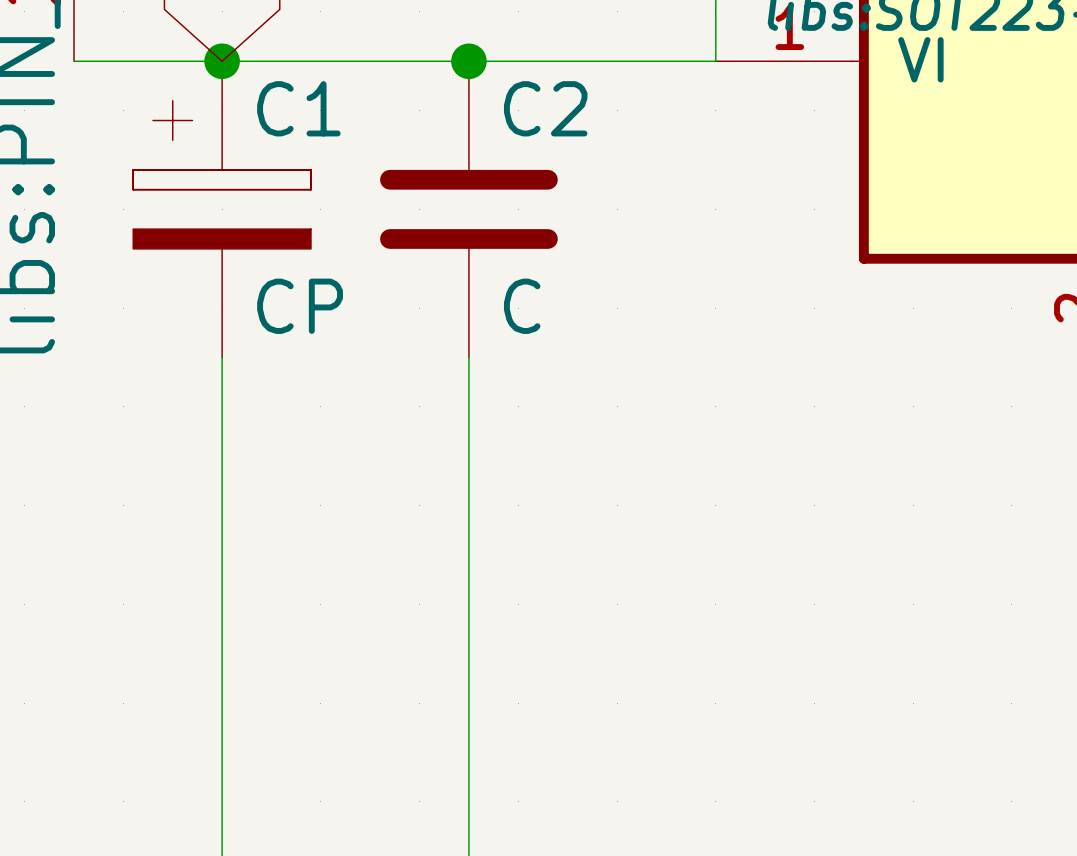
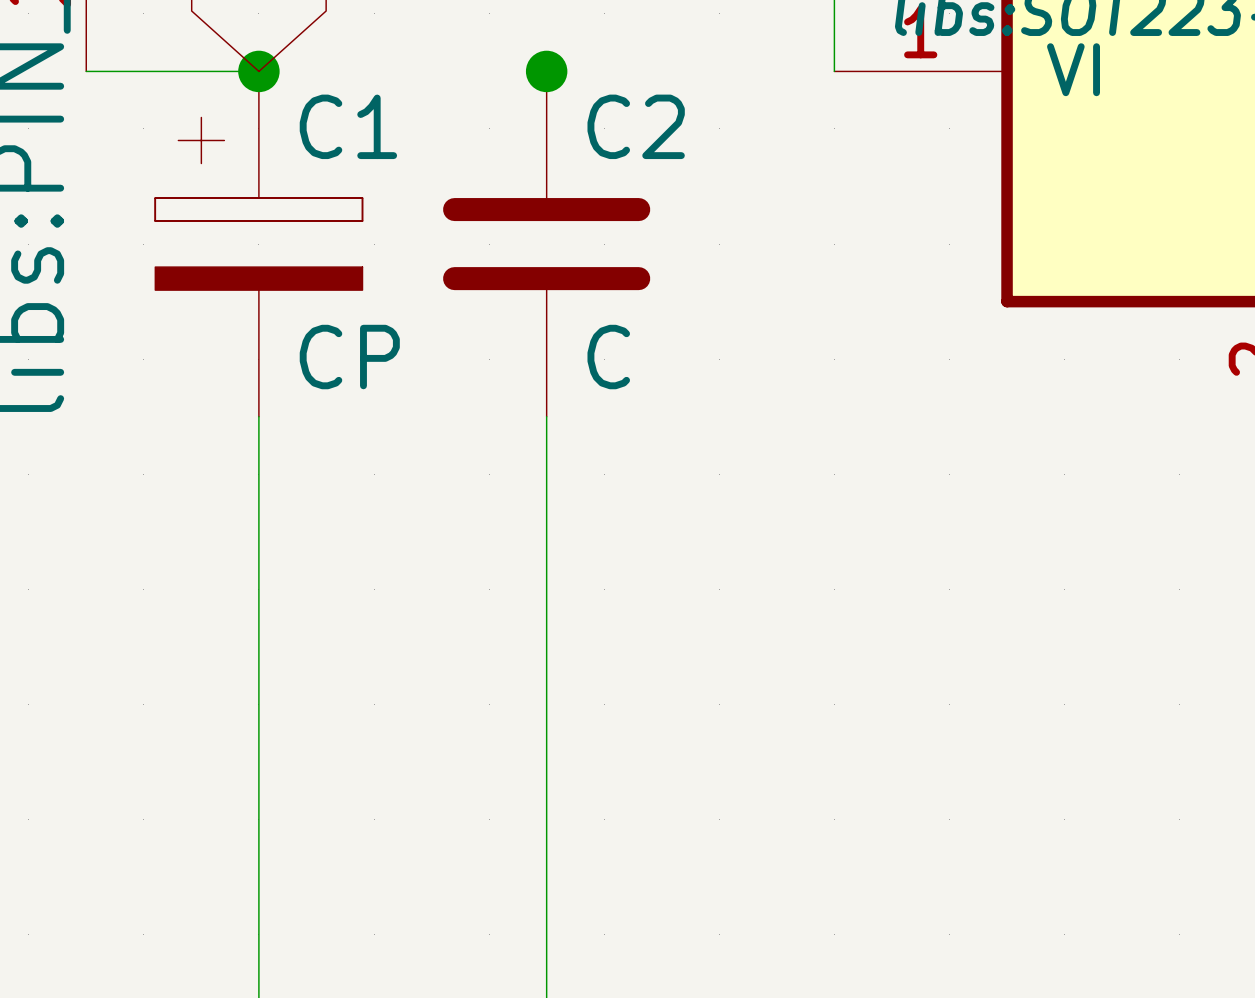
wire: (222, 61) (715, 61) -> none

